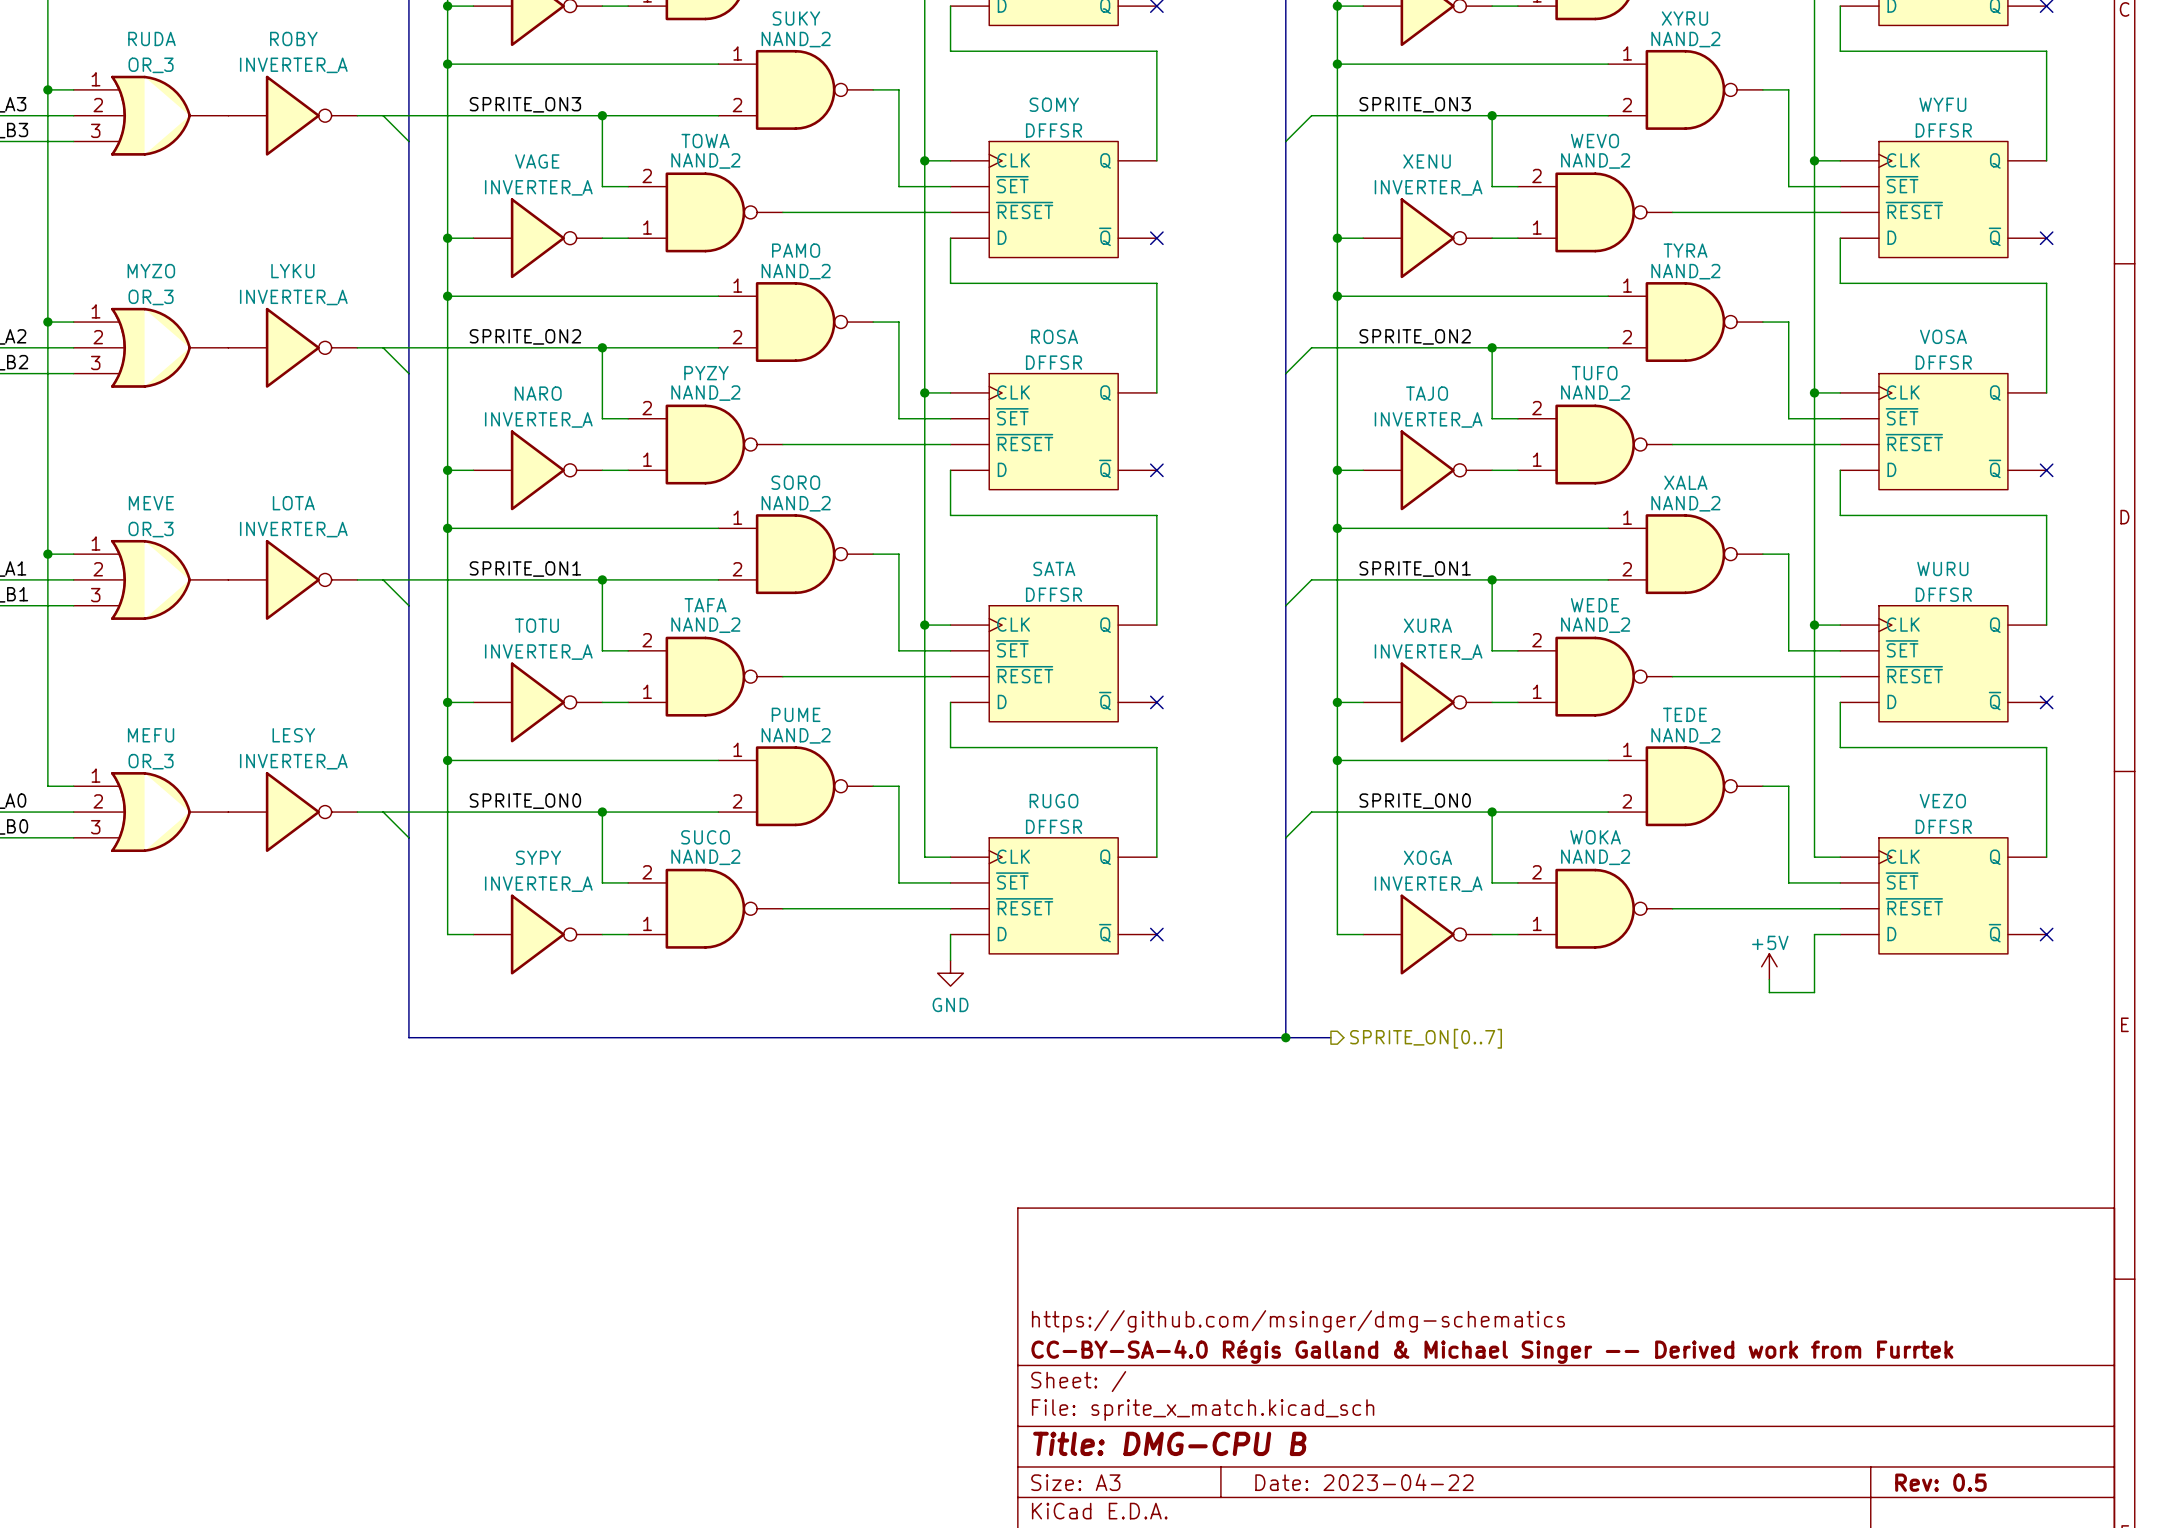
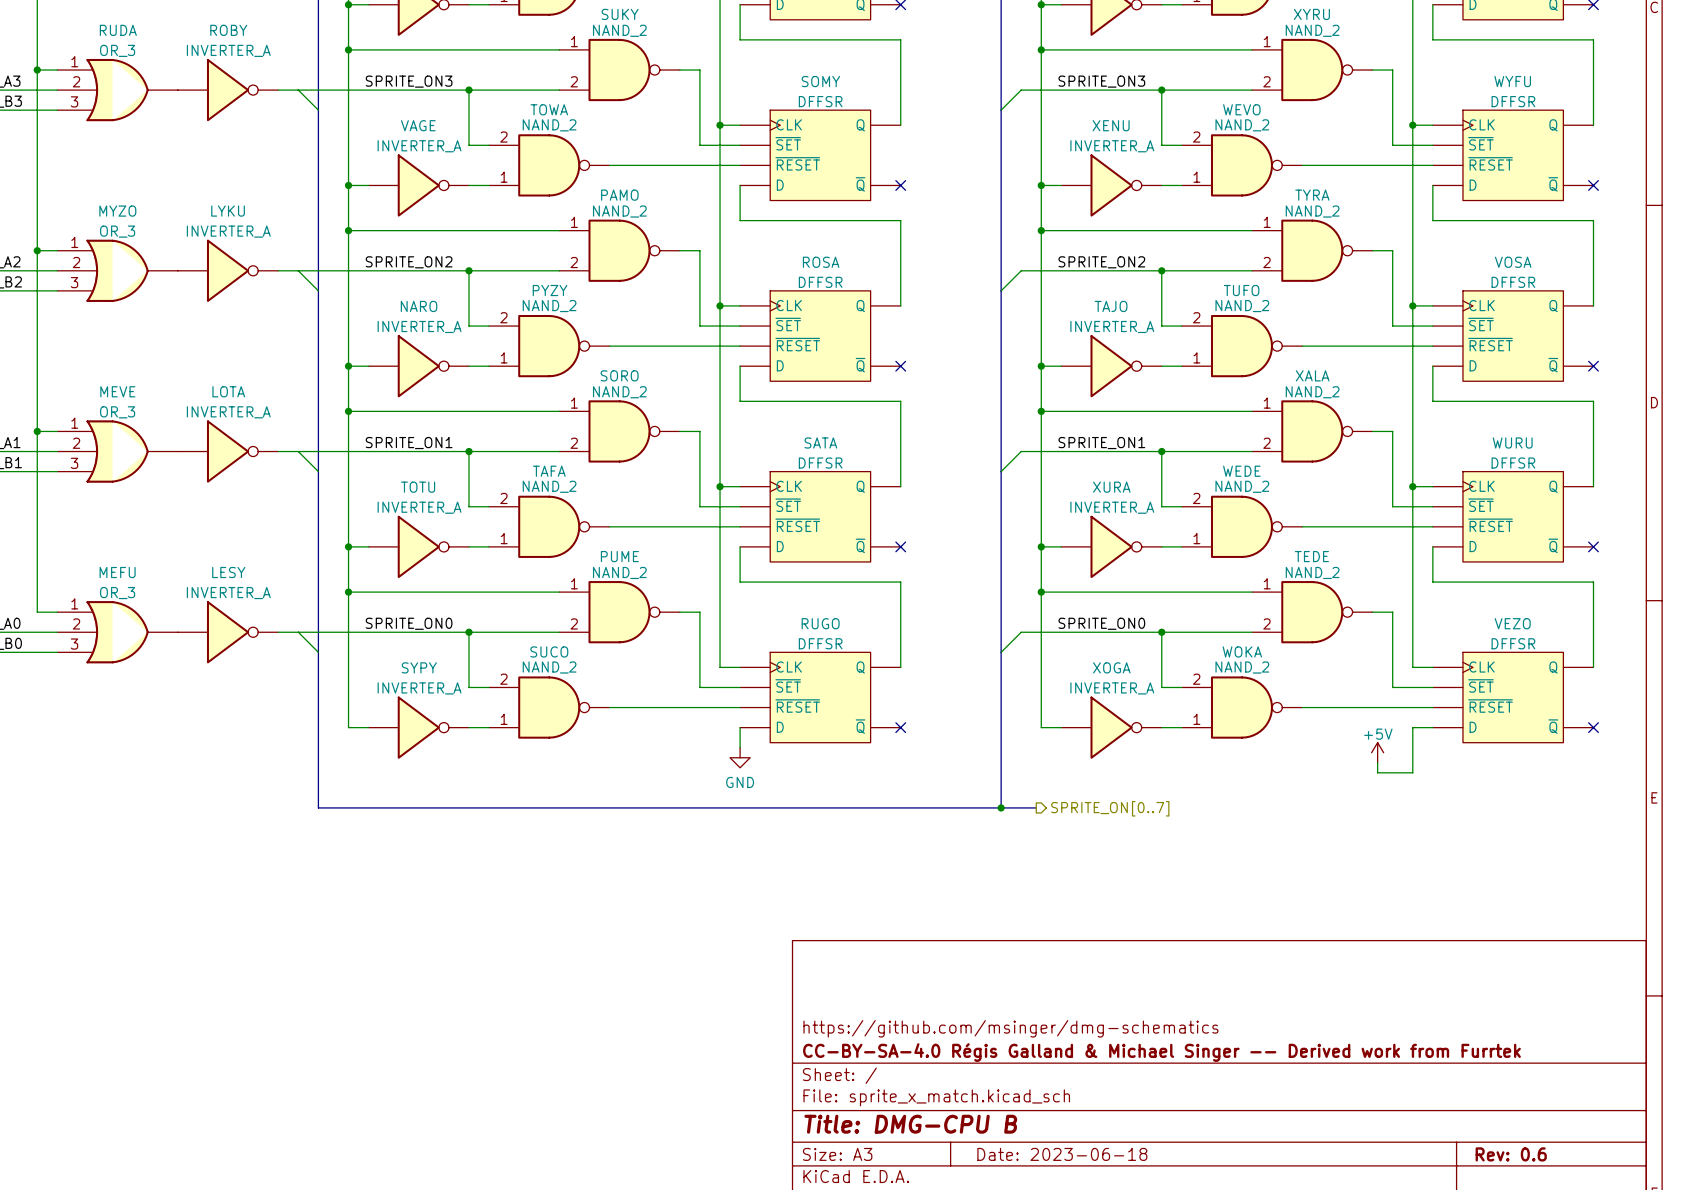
title block: Date: 2023-04-22 (1364, 1482) -> Date: 2023-06-18 (1062, 1154)
title block: Rev: 0.5 (1940, 1482) -> Rev: 0.6 (1511, 1154)

